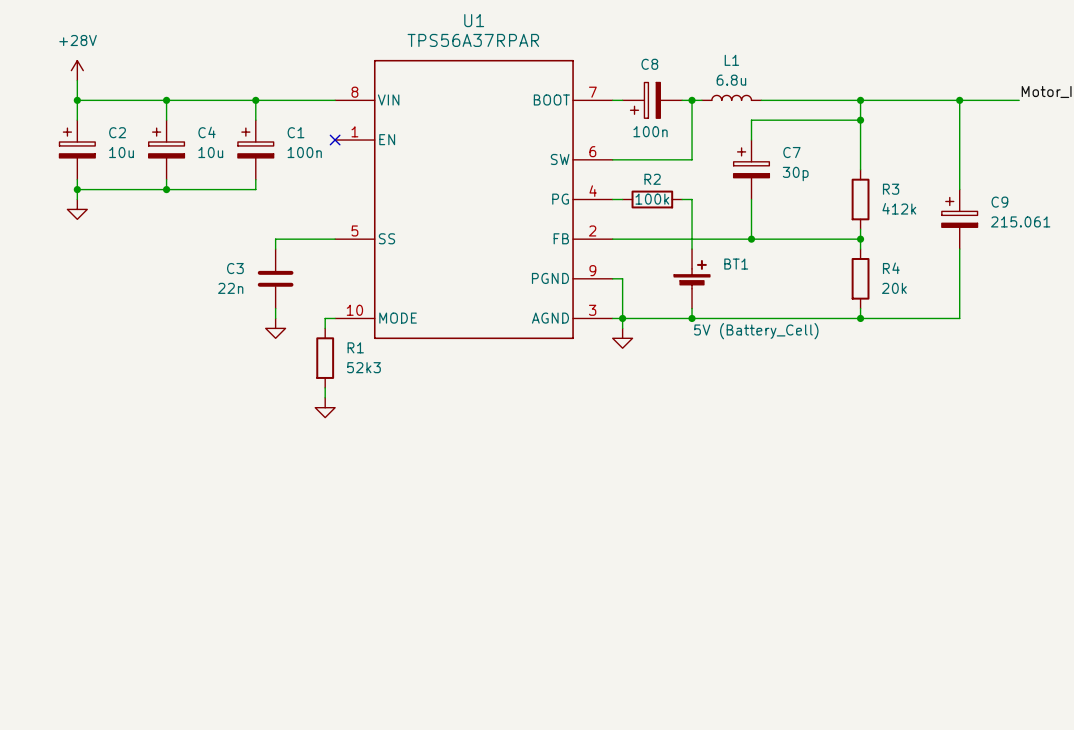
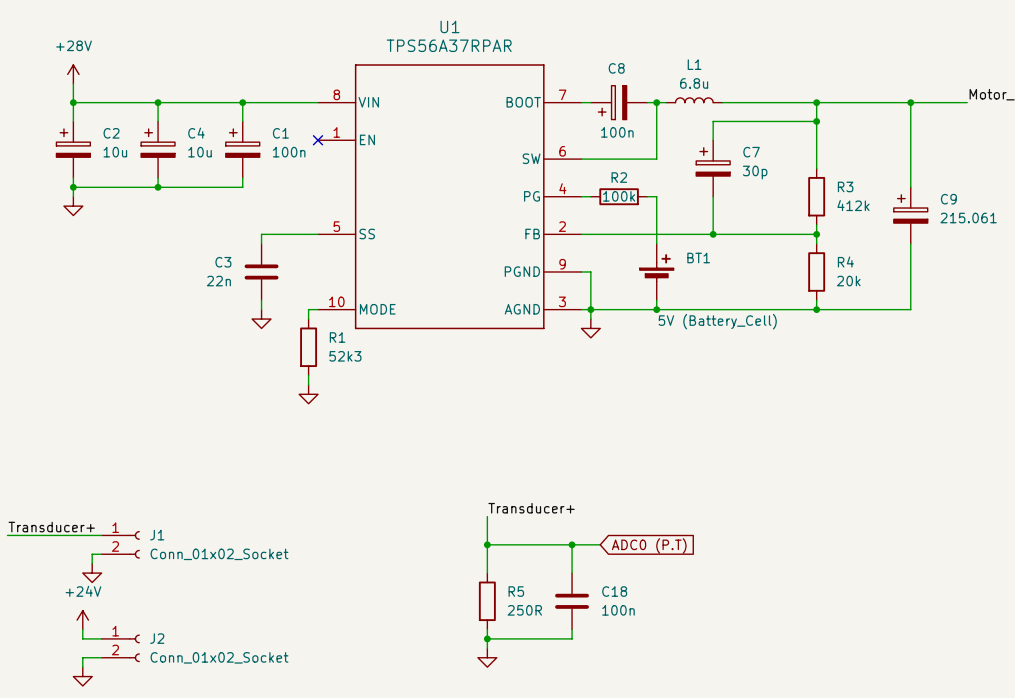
label: none -> Transducer+ (531, 508)
wire: none -> (487, 516) (487, 573)
label: none -> Transducer+ (51, 527)
wire: none -> (7, 535) (101, 535)
J1: none -> Conn_01x02_Socket (120, 544)
wire: none -> (487, 544) (600, 544)
junction: none -> (487, 544)
wire: none -> (572, 544) (572, 573)
junction: none -> (572, 544)
global label: none -> ADC0 (P.T) (649, 545)
wire: none -> (101, 554) (92, 554) (92, 563)
power symbol: none -> (92, 573)
R5: none -> 250R (487, 601)
C18: none -> 100n (572, 601)
power symbol: none -> +24V (82, 620)
wire: none -> (82, 629) (82, 638) (101, 638)
wire: none -> (487, 629) (487, 648)
wire: none -> (572, 629) (572, 638) (487, 638)
junction: none -> (487, 638)
J2: none -> Conn_01x02_Socket (120, 648)
wire: none -> (101, 657) (82, 657) (82, 667)
power symbol: none -> (487, 657)
power symbol: none -> (82, 676)

